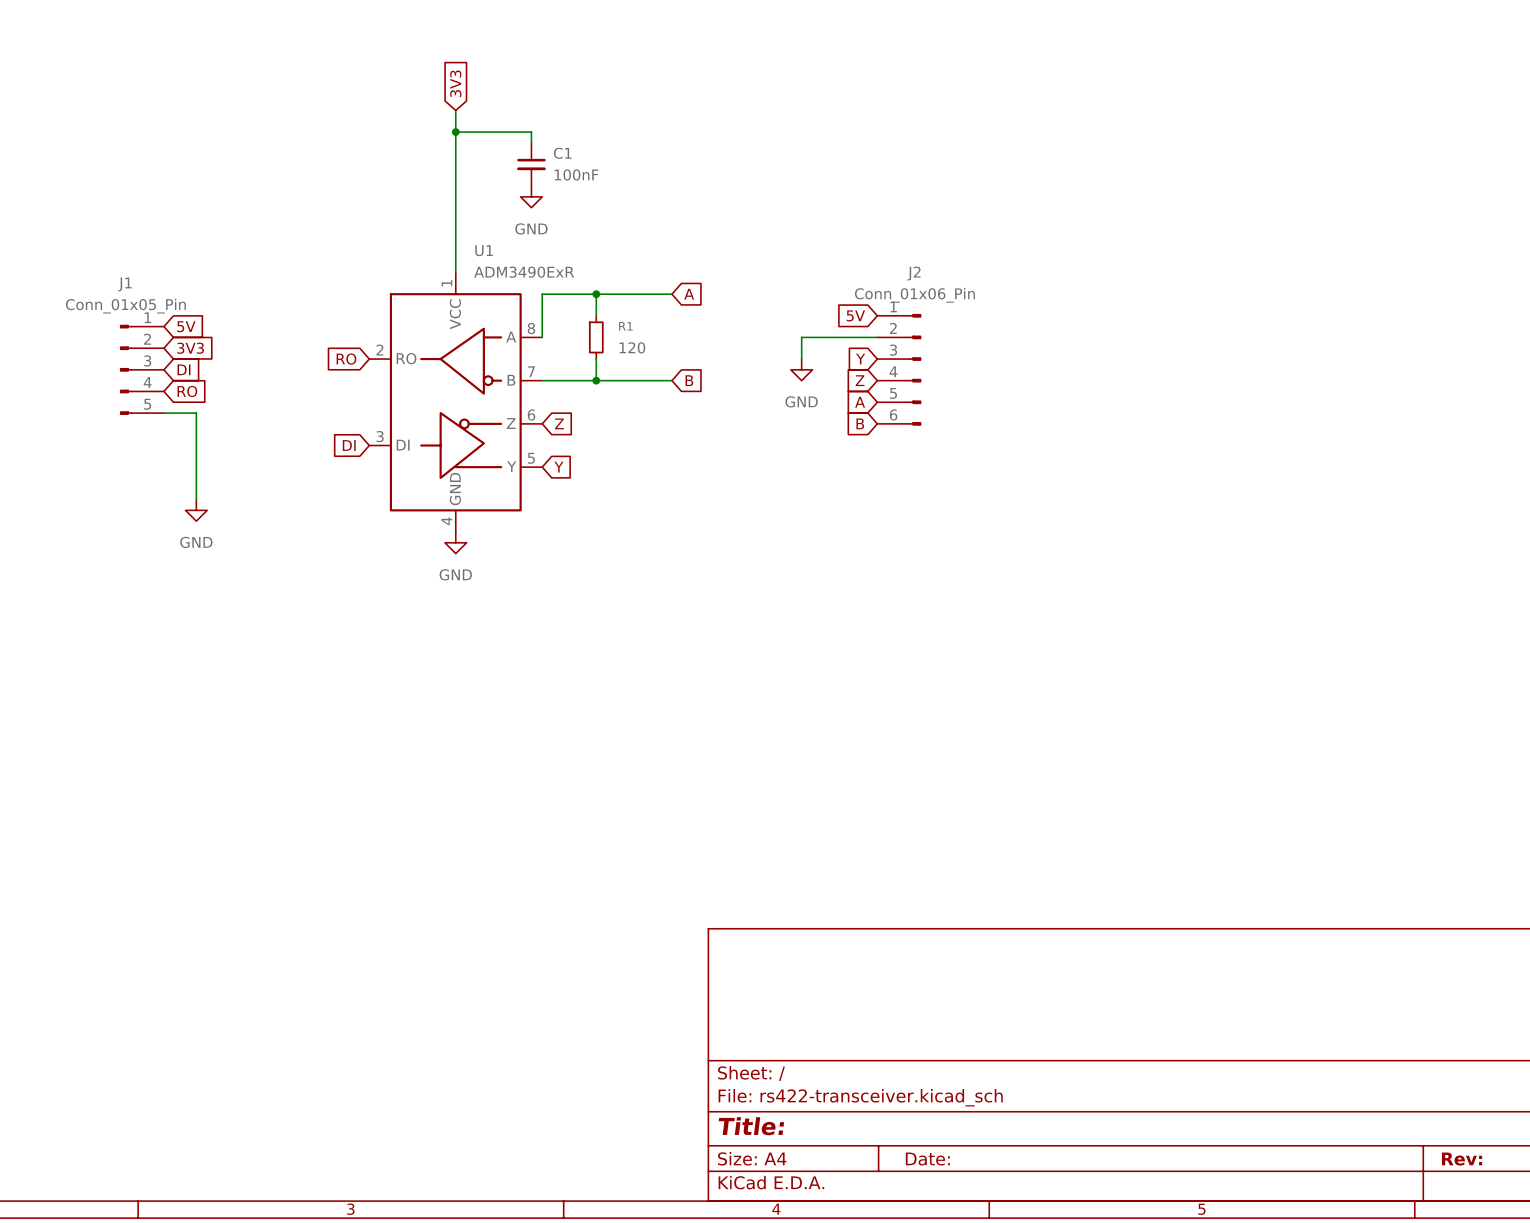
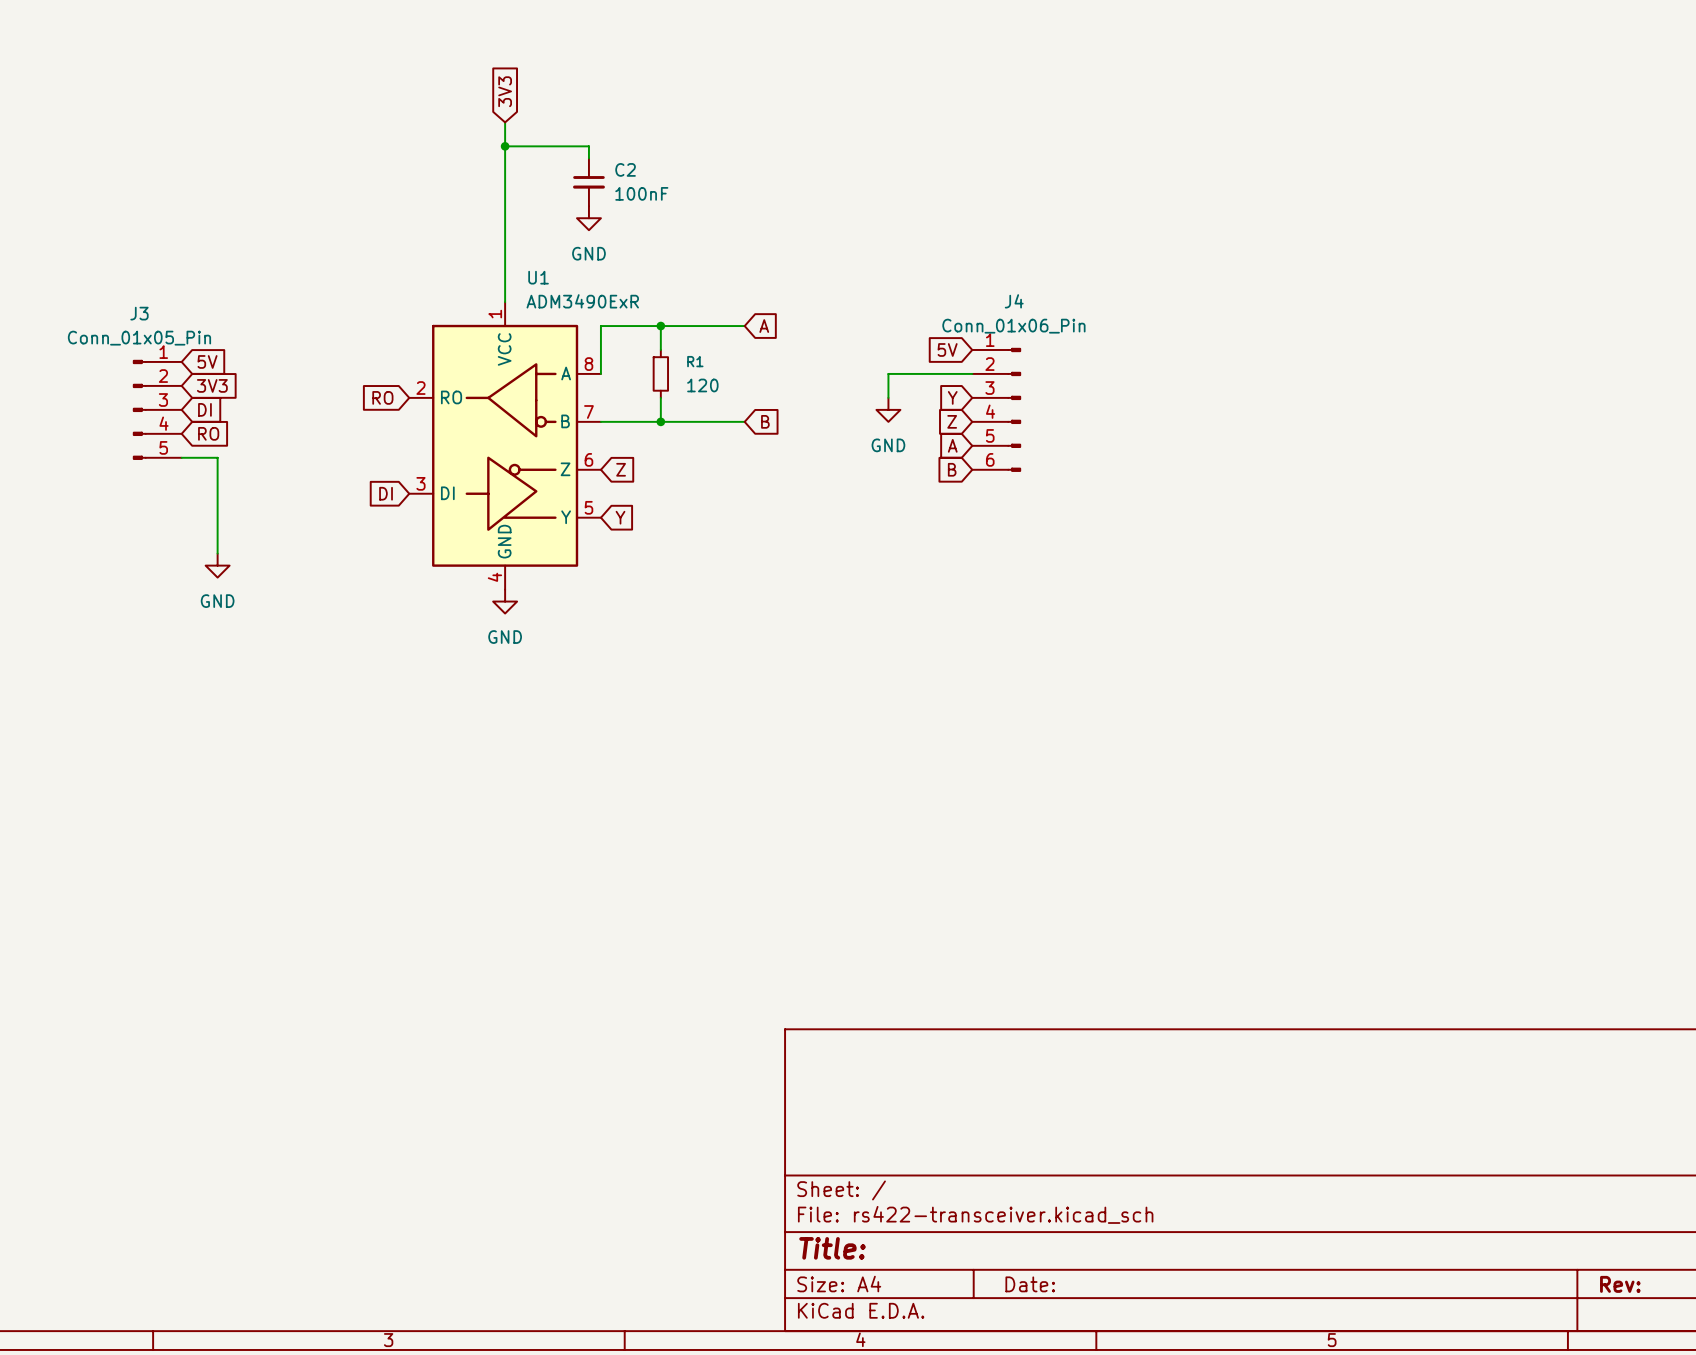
C1 name: C1 (562, 153) -> C2 (625, 169)
J2 name: J2 (914, 273) -> J4 (1014, 301)
J1 name: J1 (125, 284) -> J3 (139, 313)

